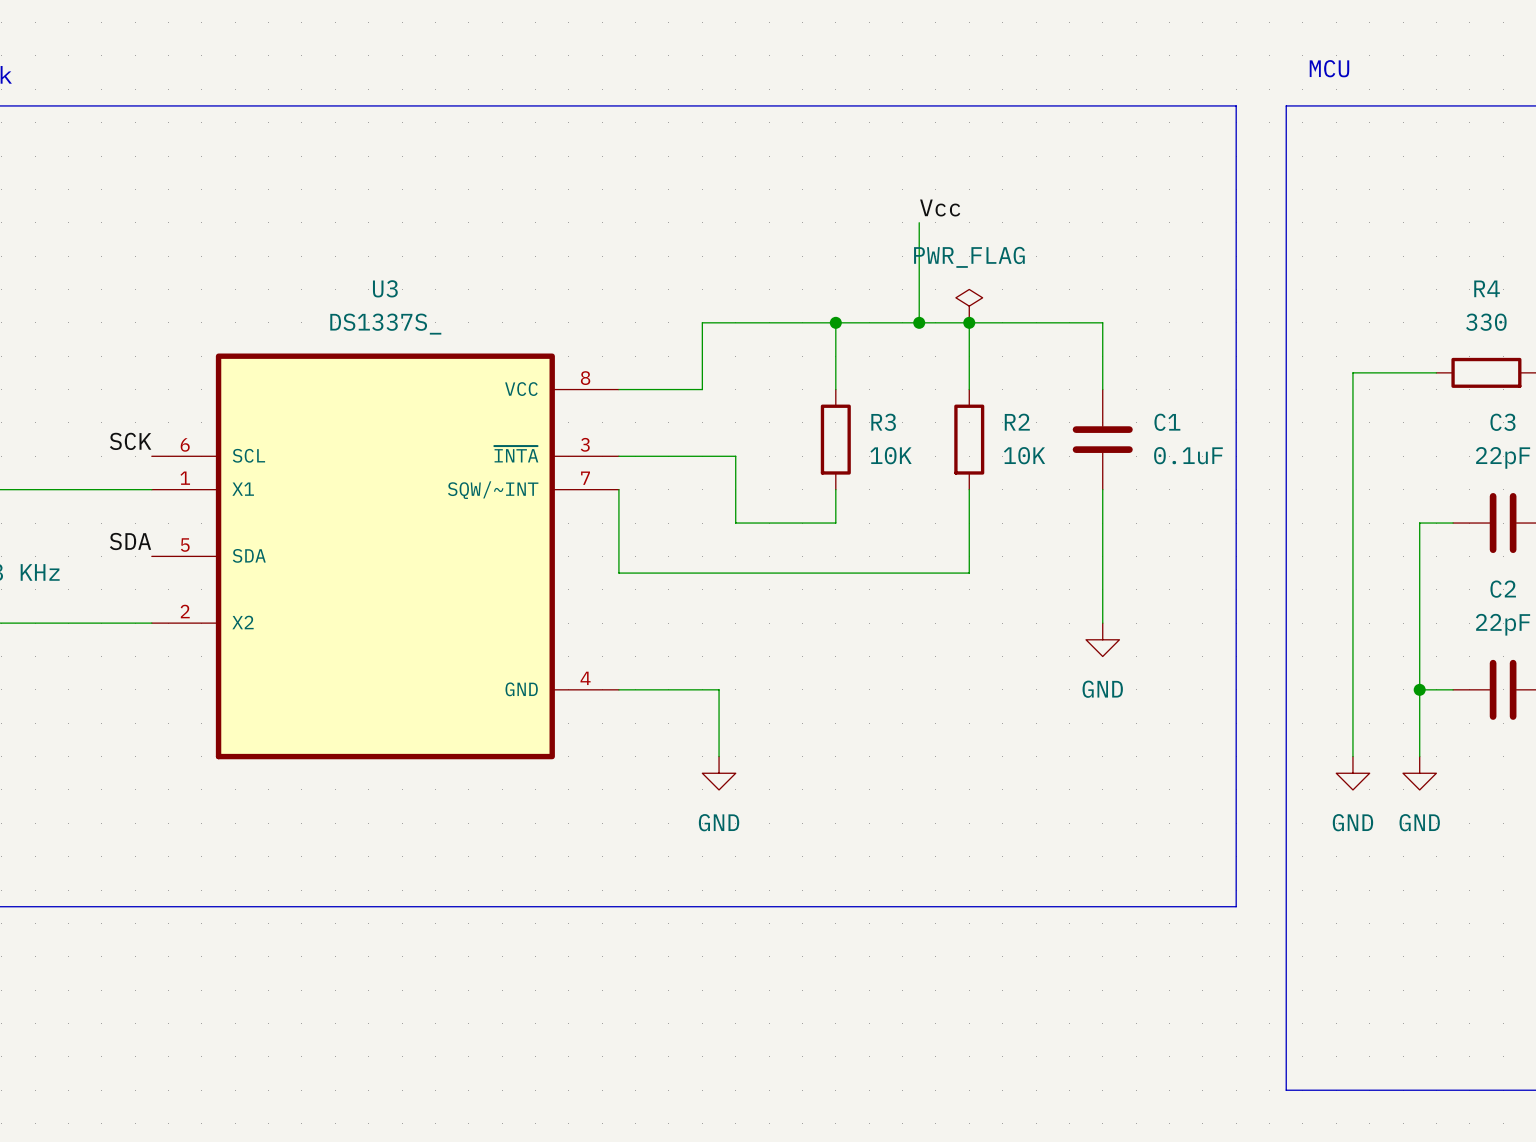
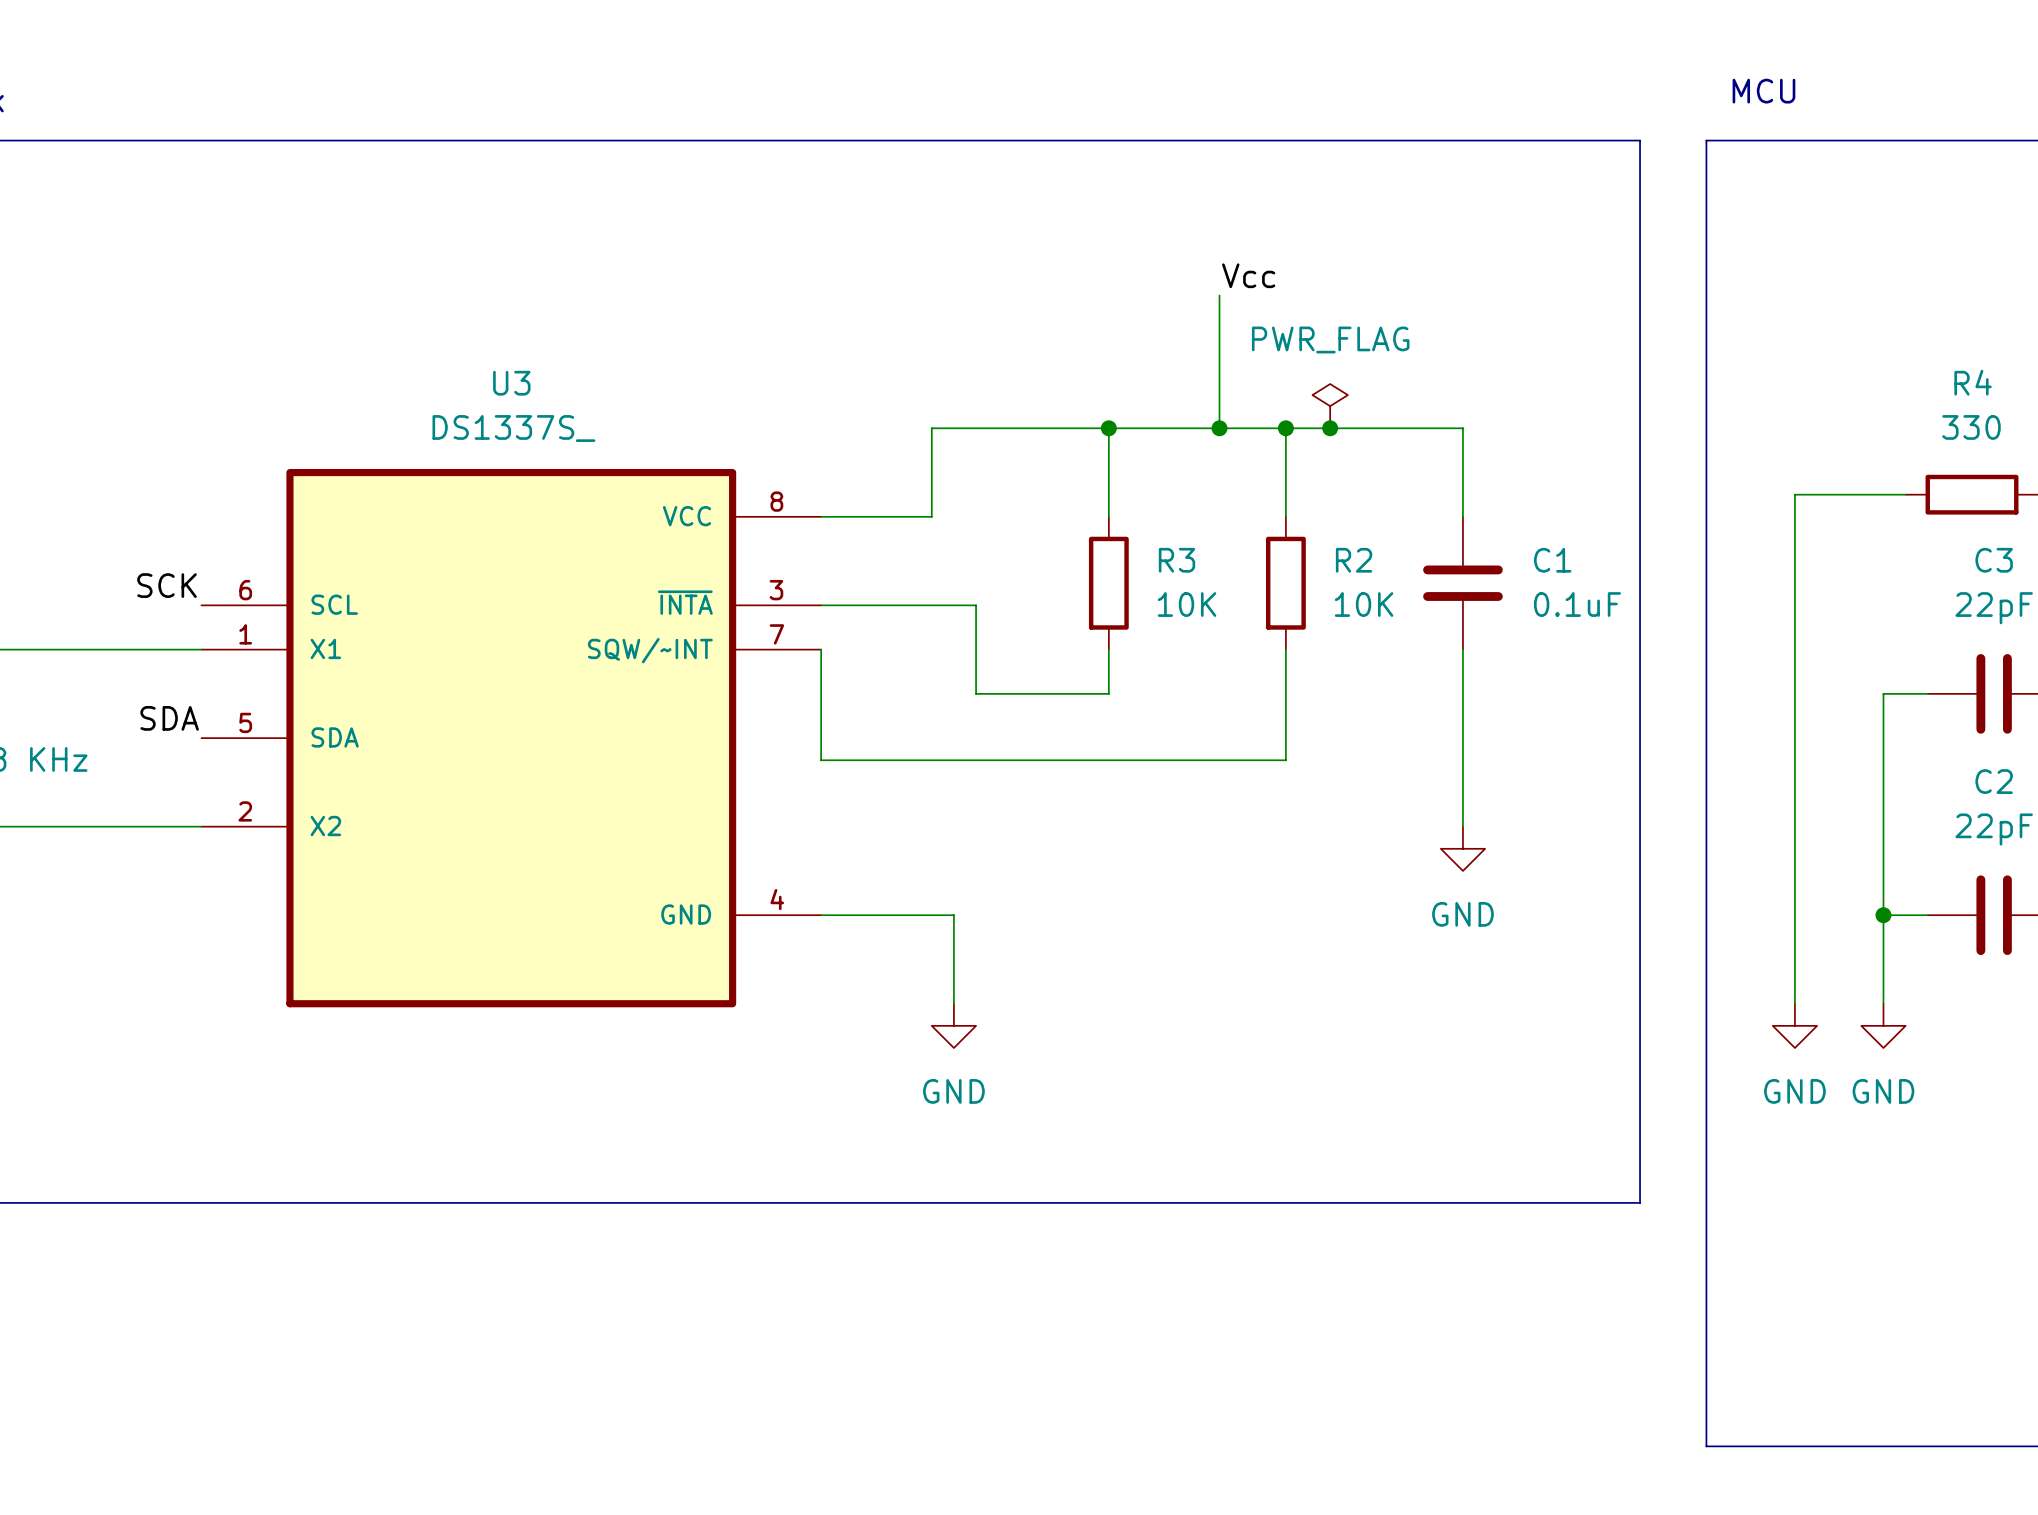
power symbol position: PWR_FLAG (969, 306) -> PWR_FLAG (1330, 406)
junction: none -> (1330, 428)

